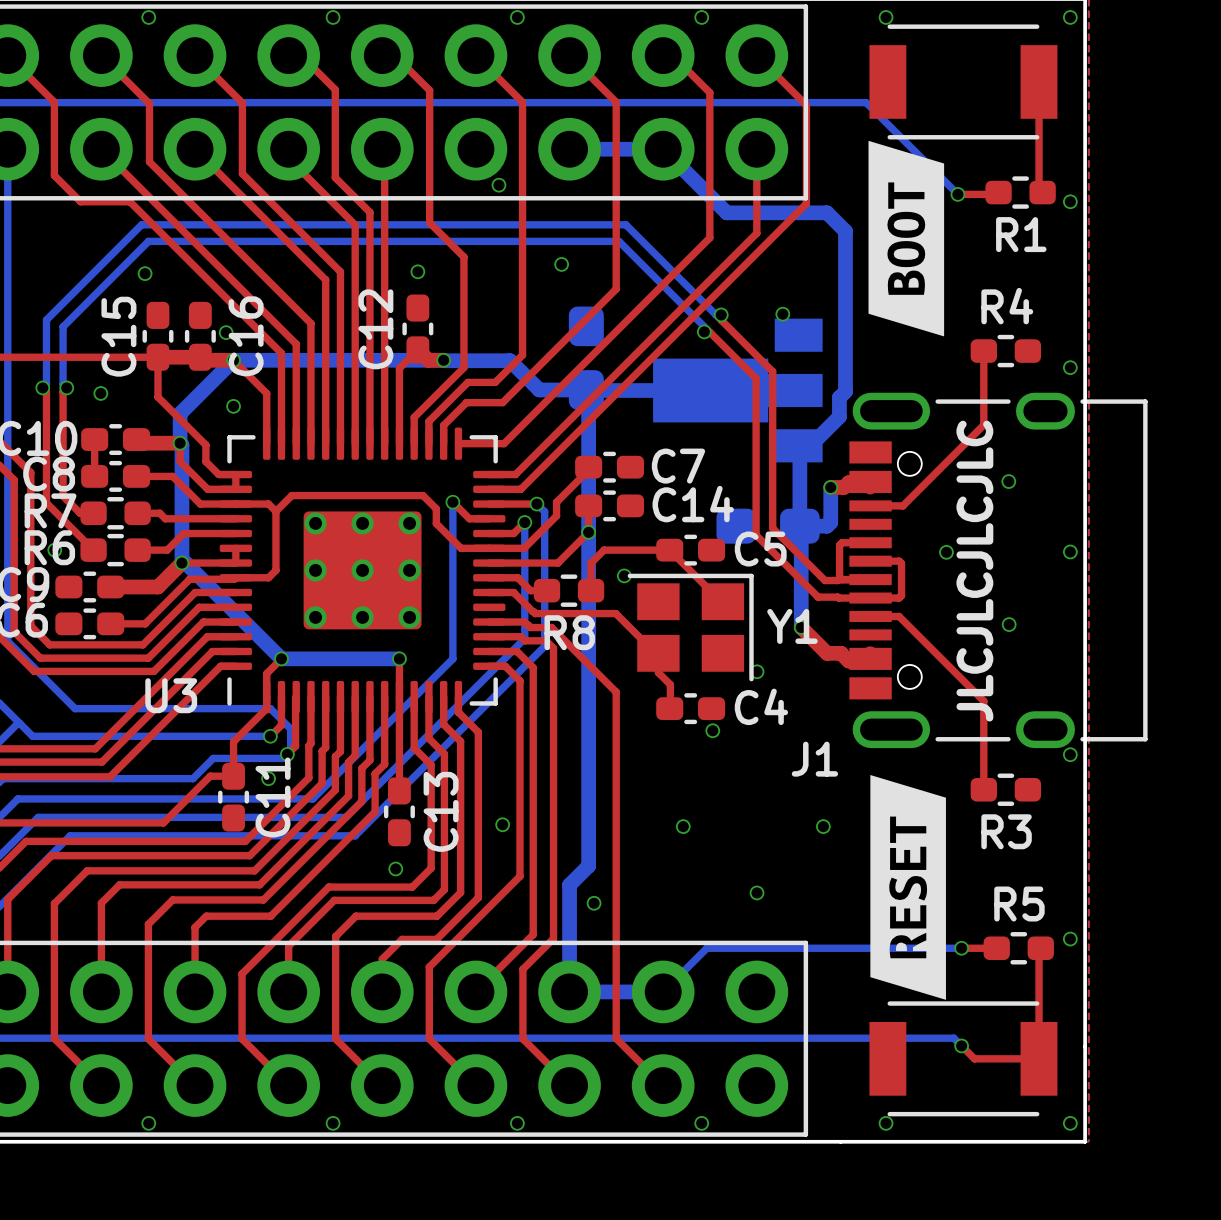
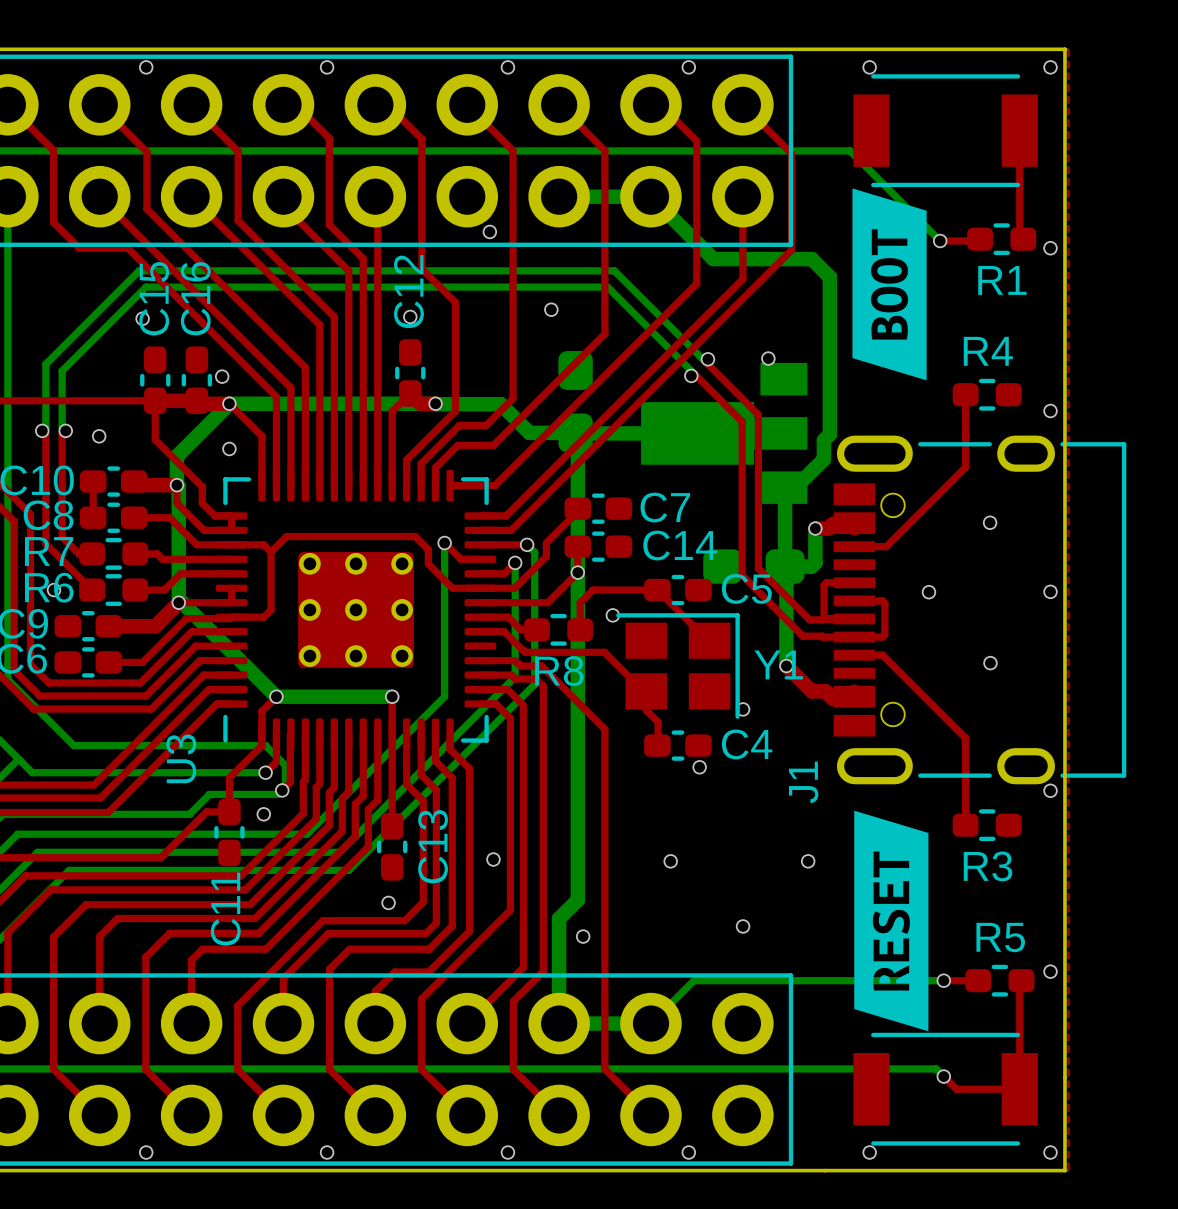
C12 name position: C12 (375, 329) -> C12 (408, 291)
C15 name position: C15 (118, 336) -> C15 (154, 298)
C16 name position: C16 (246, 336) -> C16 (195, 298)
text: JLCJLCJLCJLC (974, 571) -> none
U3 name rotation: 0° (171, 695) -> 90° counterclockwise (181, 758)
J1 name rotation: 0° (814, 759) -> 90° counterclockwise (803, 782)
C11 name position: C11 (273, 797) -> C11 (225, 909)

